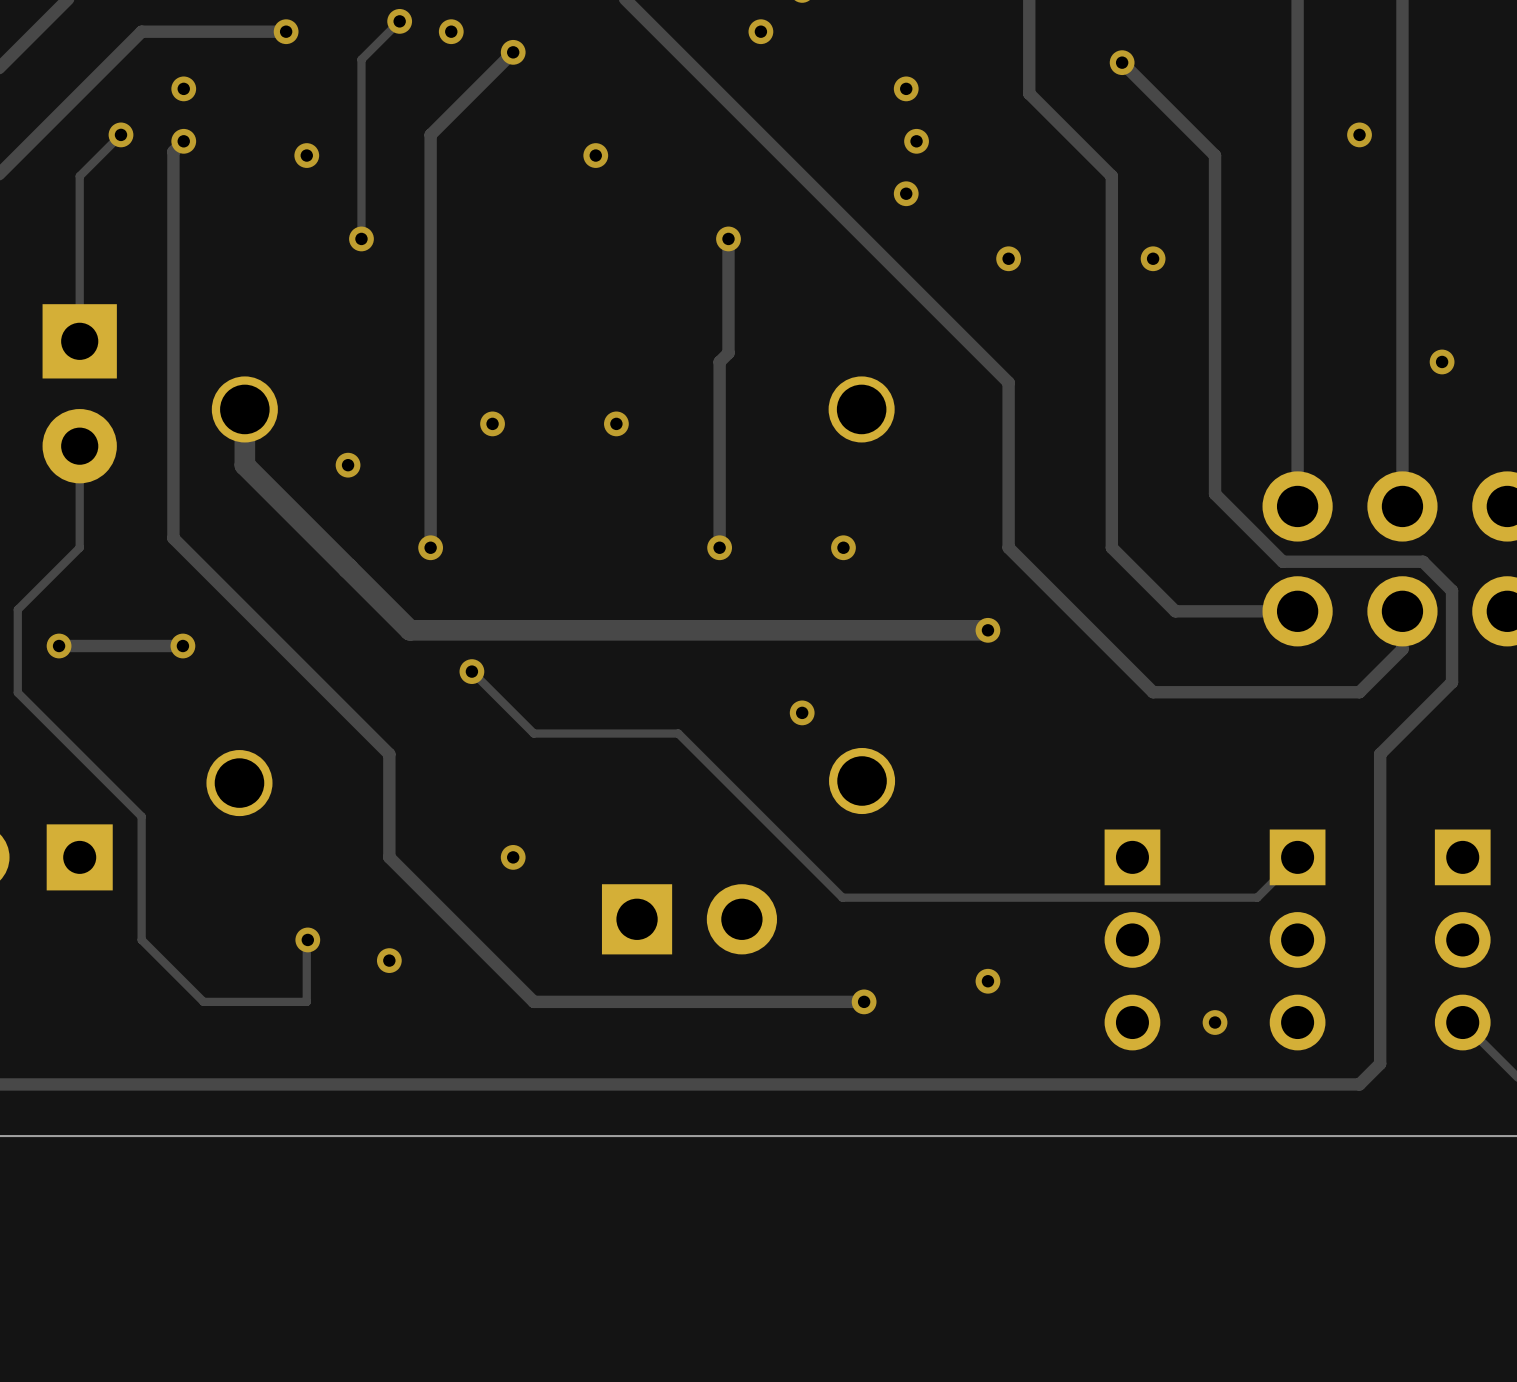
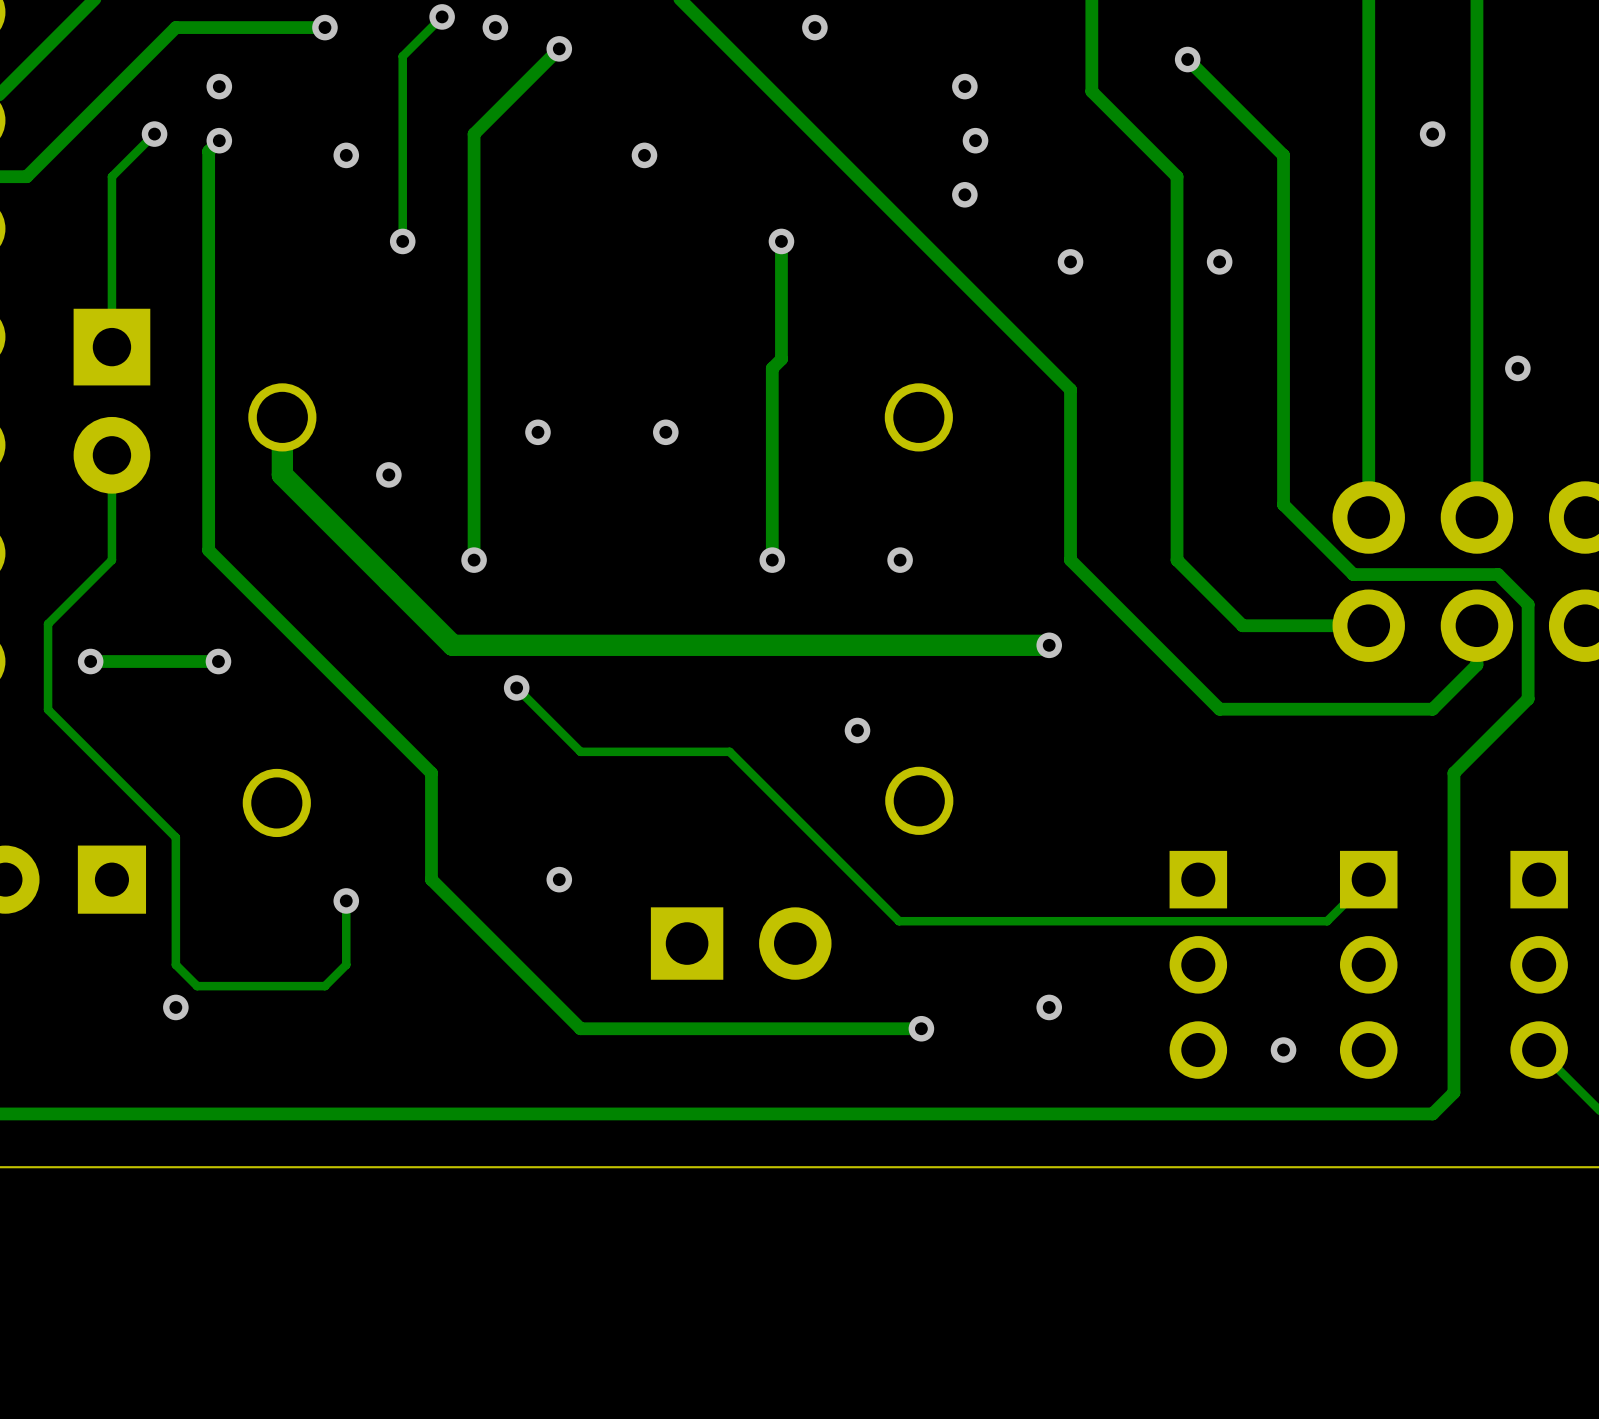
via: none -> (346, 900)
track: (307, 939) (306, 1001) (203, 1001) (162, 960) -> (346, 900) (346, 964) (324, 986) (197, 986)
via: (307, 939) -> none
via: (389, 960) -> none
via: none -> (175, 1007)

